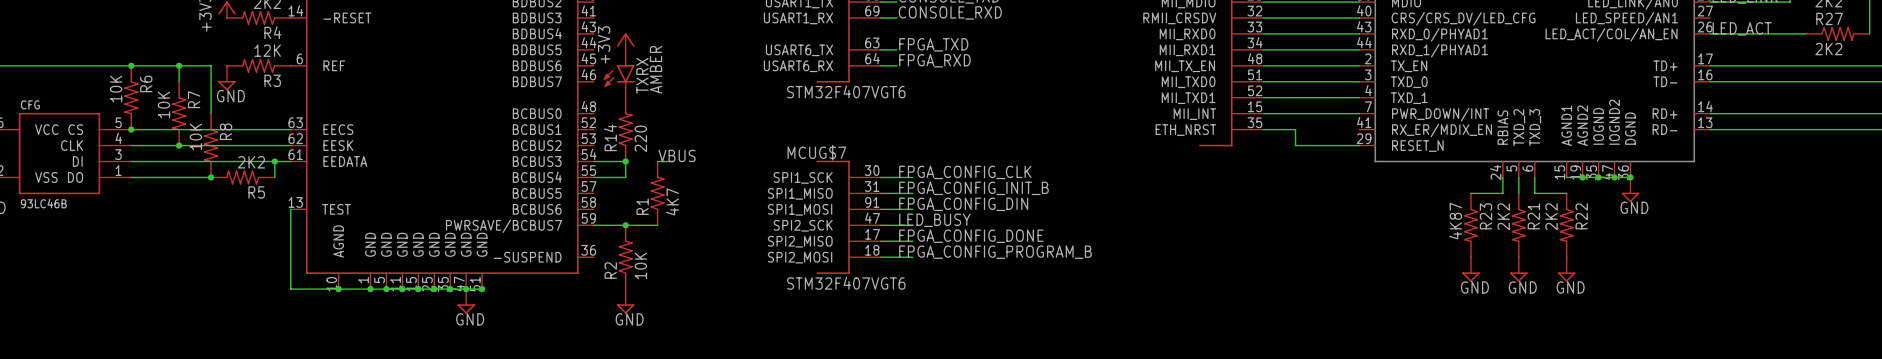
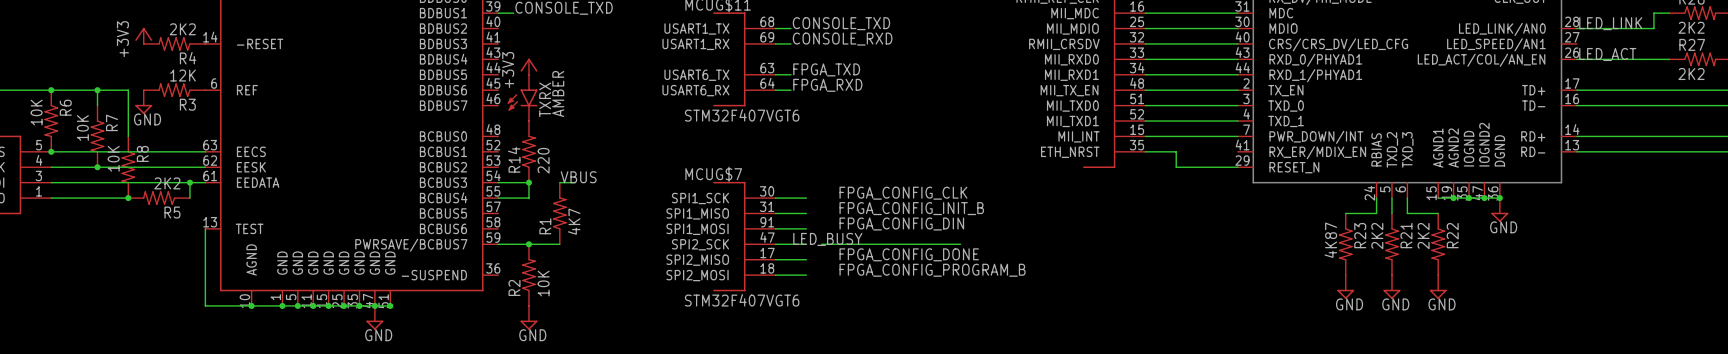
label position: FPGA_CONFIG_CLK (965, 172) -> FPGA_CONFIG_CLK (903, 193)
label position: FPGA_CONFIG_INIT_B (973, 188) -> FPGA_CONFIG_INIT_B (911, 208)
label position: FPGA_CONFIG_DIN (963, 204) -> FPGA_CONFIG_DIN (901, 224)
wire: none -> (821, 244) (960, 244)
label position: FPGA_CONFIG_DONE (971, 236) -> FPGA_CONFIG_DONE (909, 254)
label position: FPGA_CONFIG_PROGRAM_B (995, 252) -> FPGA_CONFIG_PROGRAM_B (932, 270)

